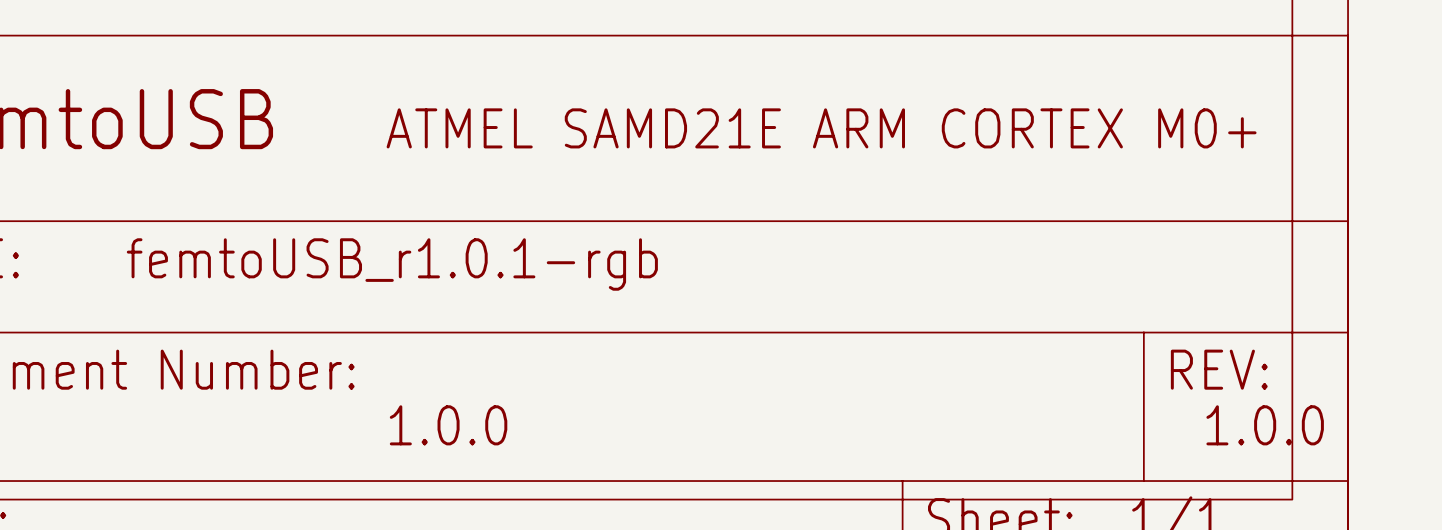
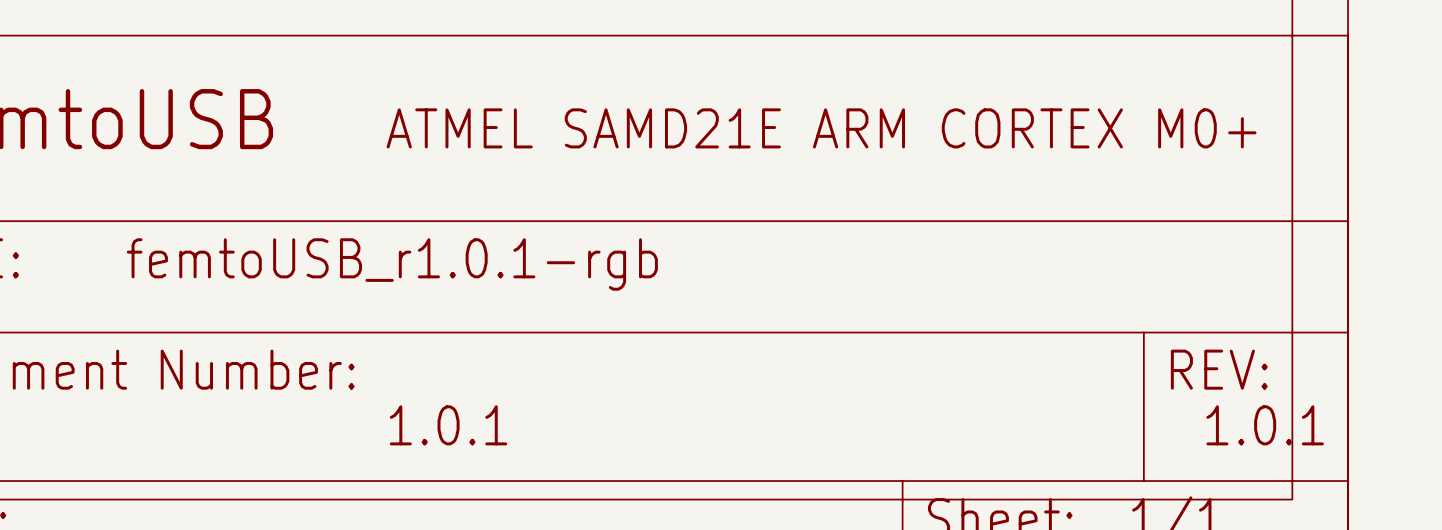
text: 1.0.0 (448, 425) -> 1.0.1 (448, 425)
text: 1.0.0 (1265, 425) -> 1.0.1 (1265, 425)

